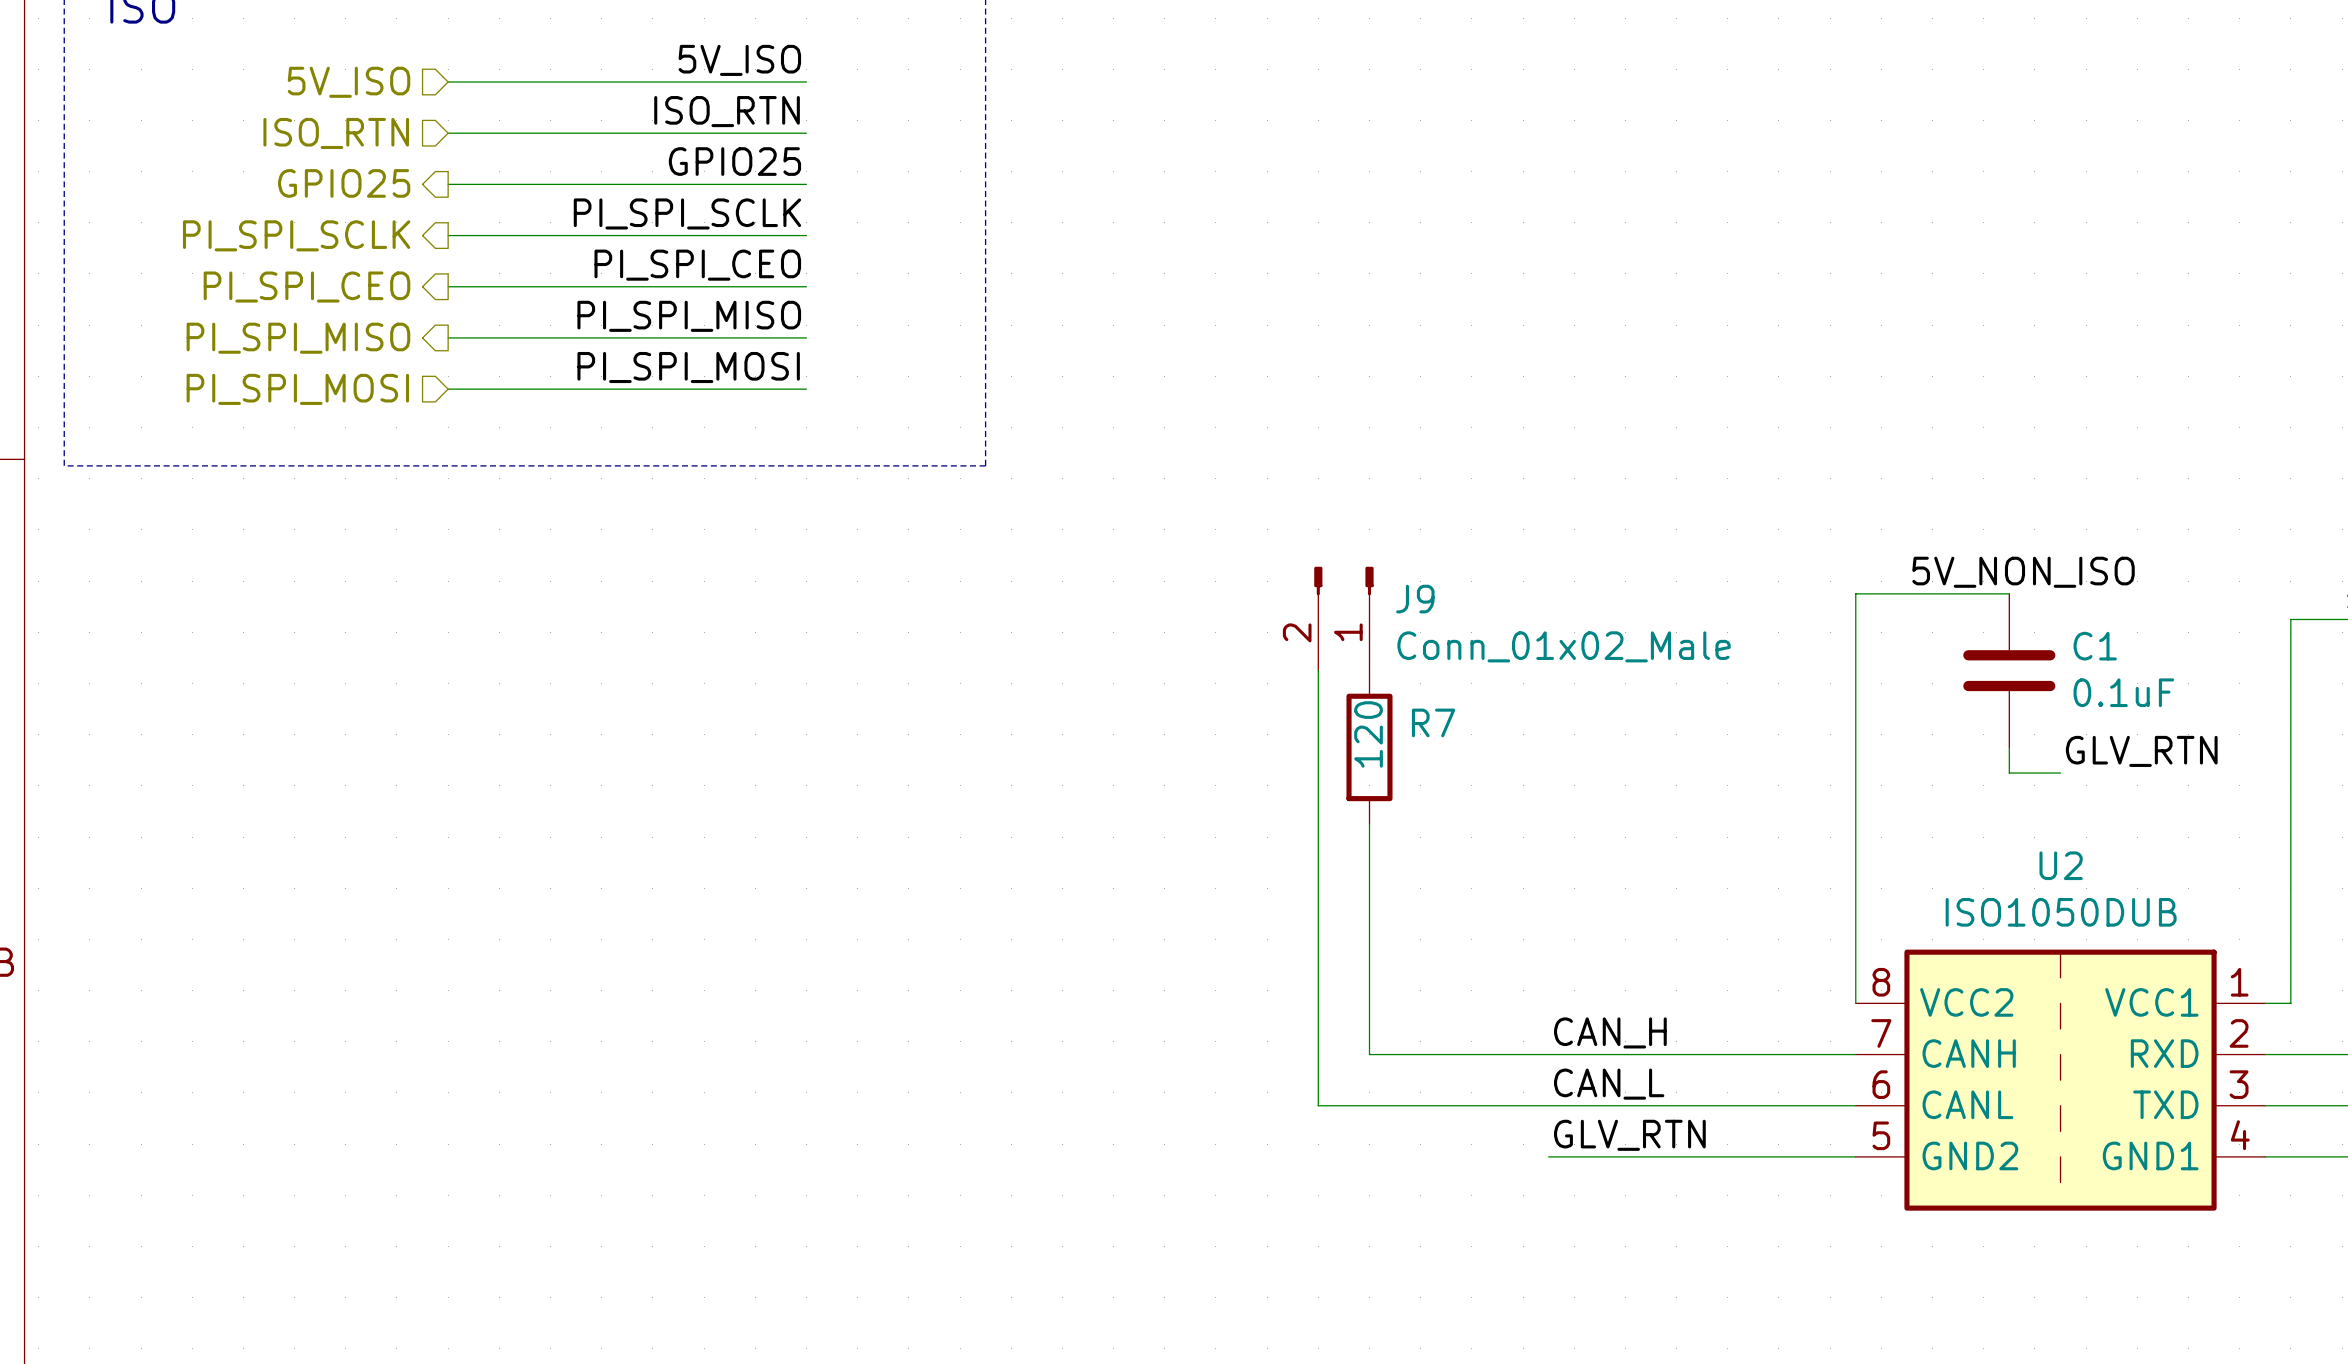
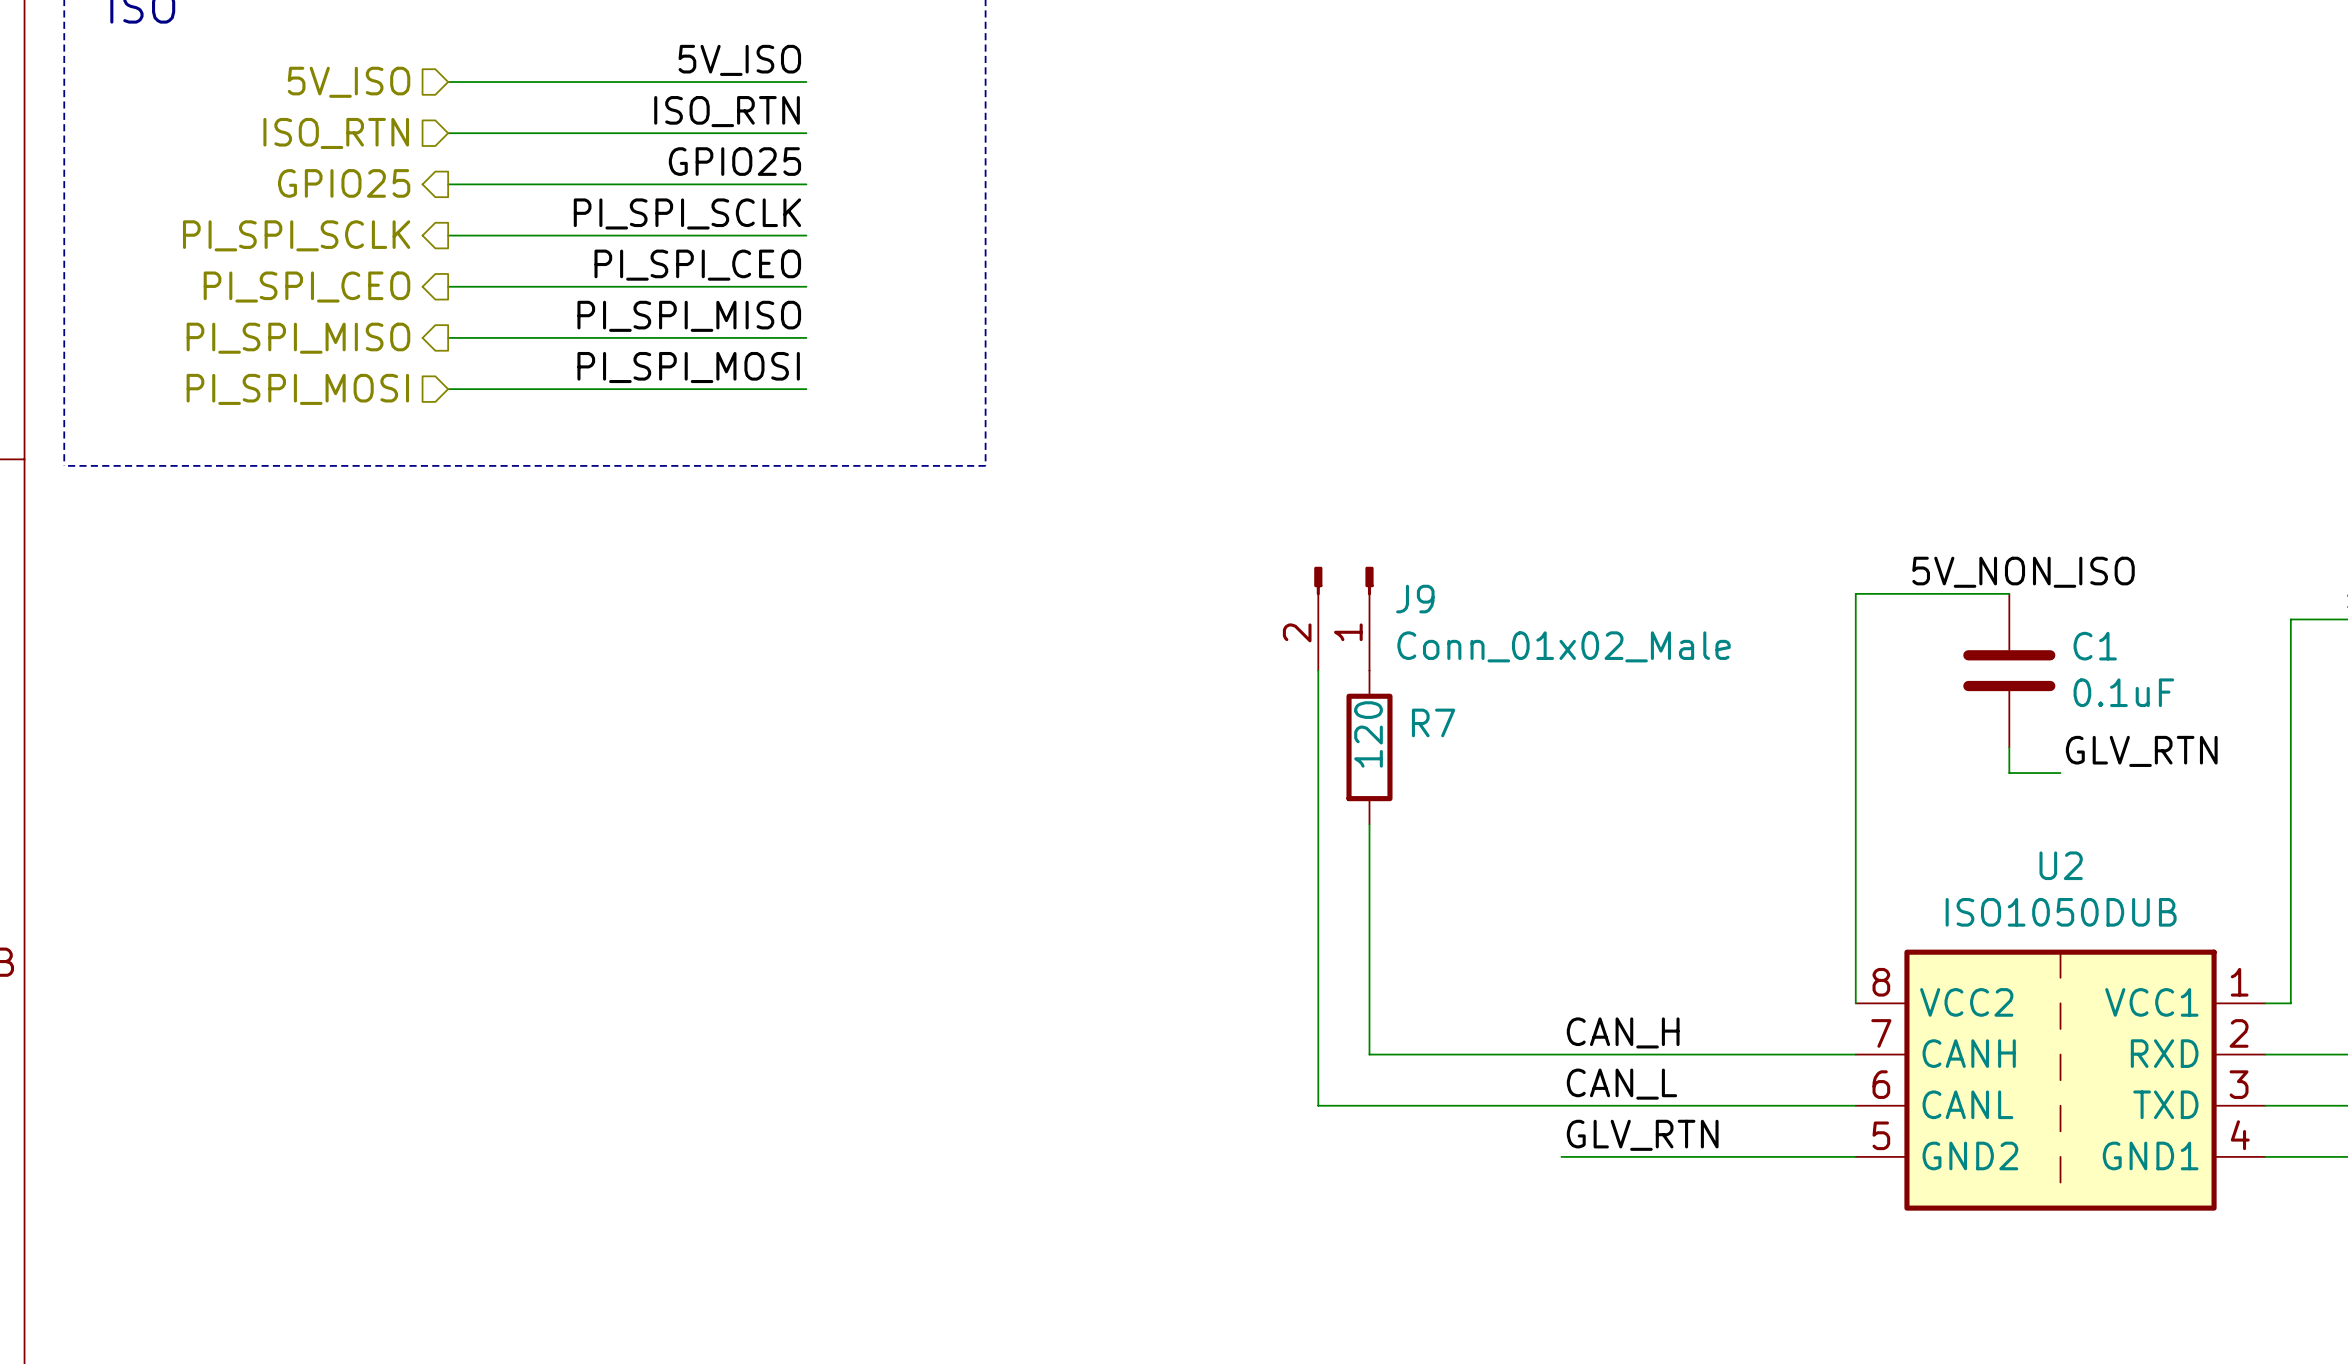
label position: CAN_H (1610, 1032) -> CAN_H (1623, 1032)
label position: CAN_L (1609, 1084) -> CAN_L (1621, 1084)
label position: GLV_RTN (1629, 1135) -> GLV_RTN (1642, 1135)
wire: (1548, 1156) (1561, 1156) -> none

